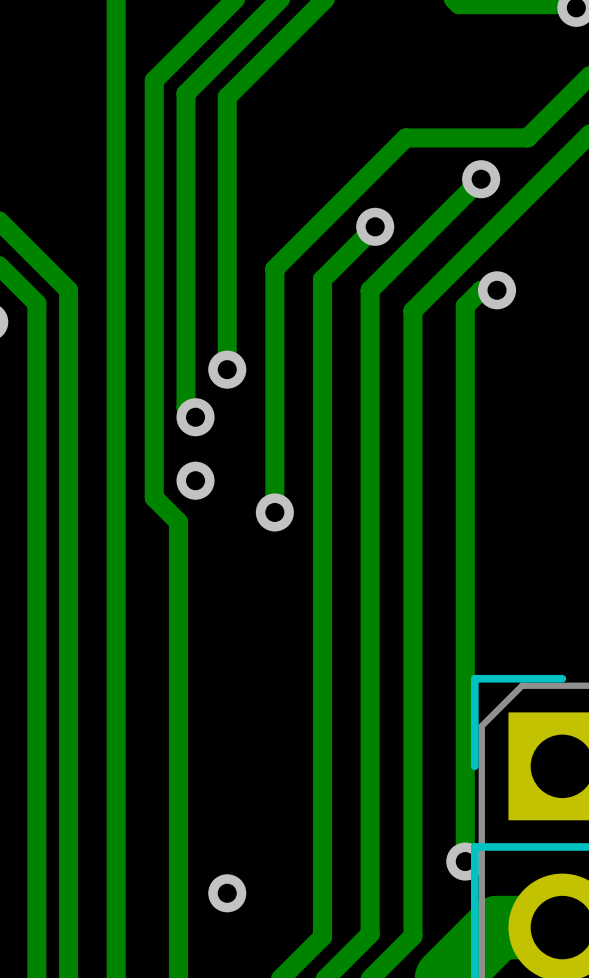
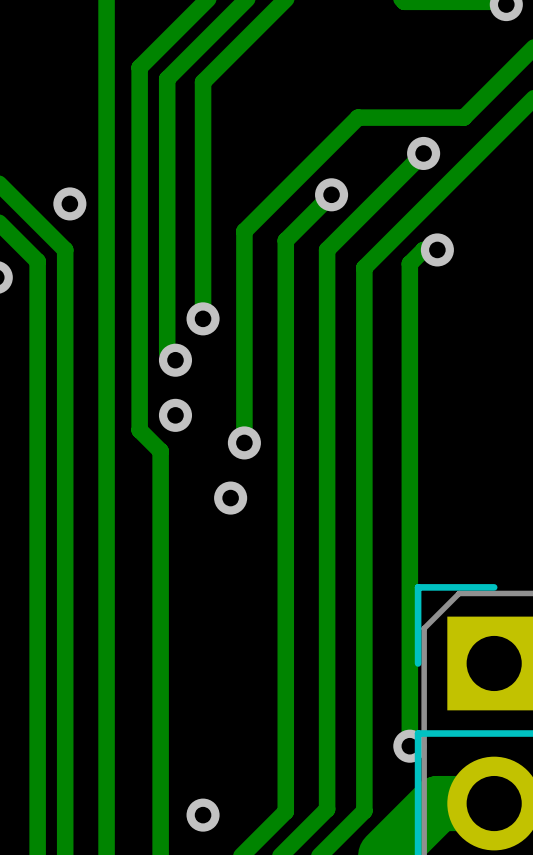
via: none -> (69, 203)
via: none -> (230, 498)
via position: (227, 893) -> (203, 815)

